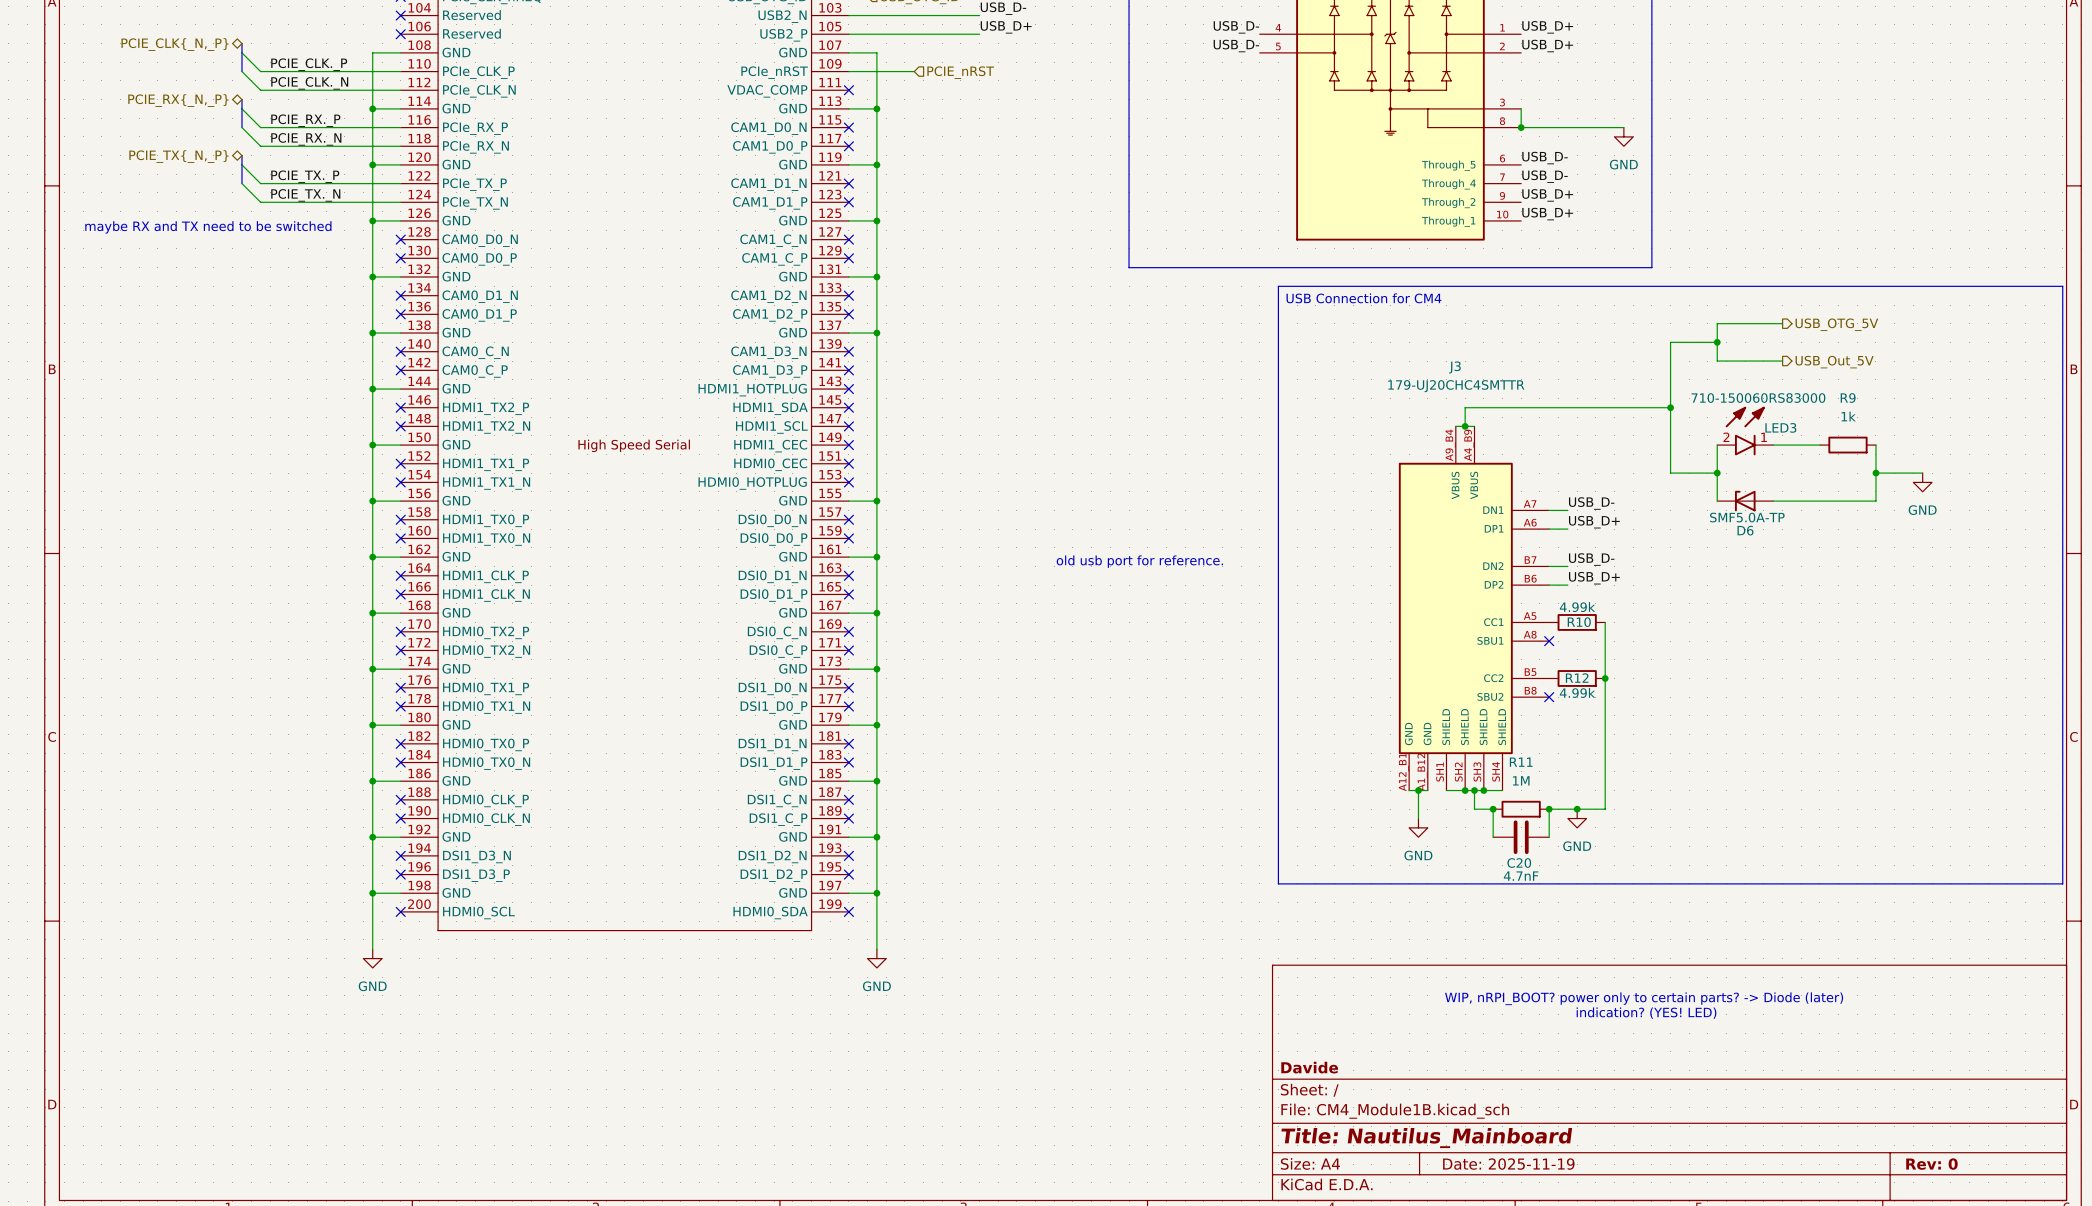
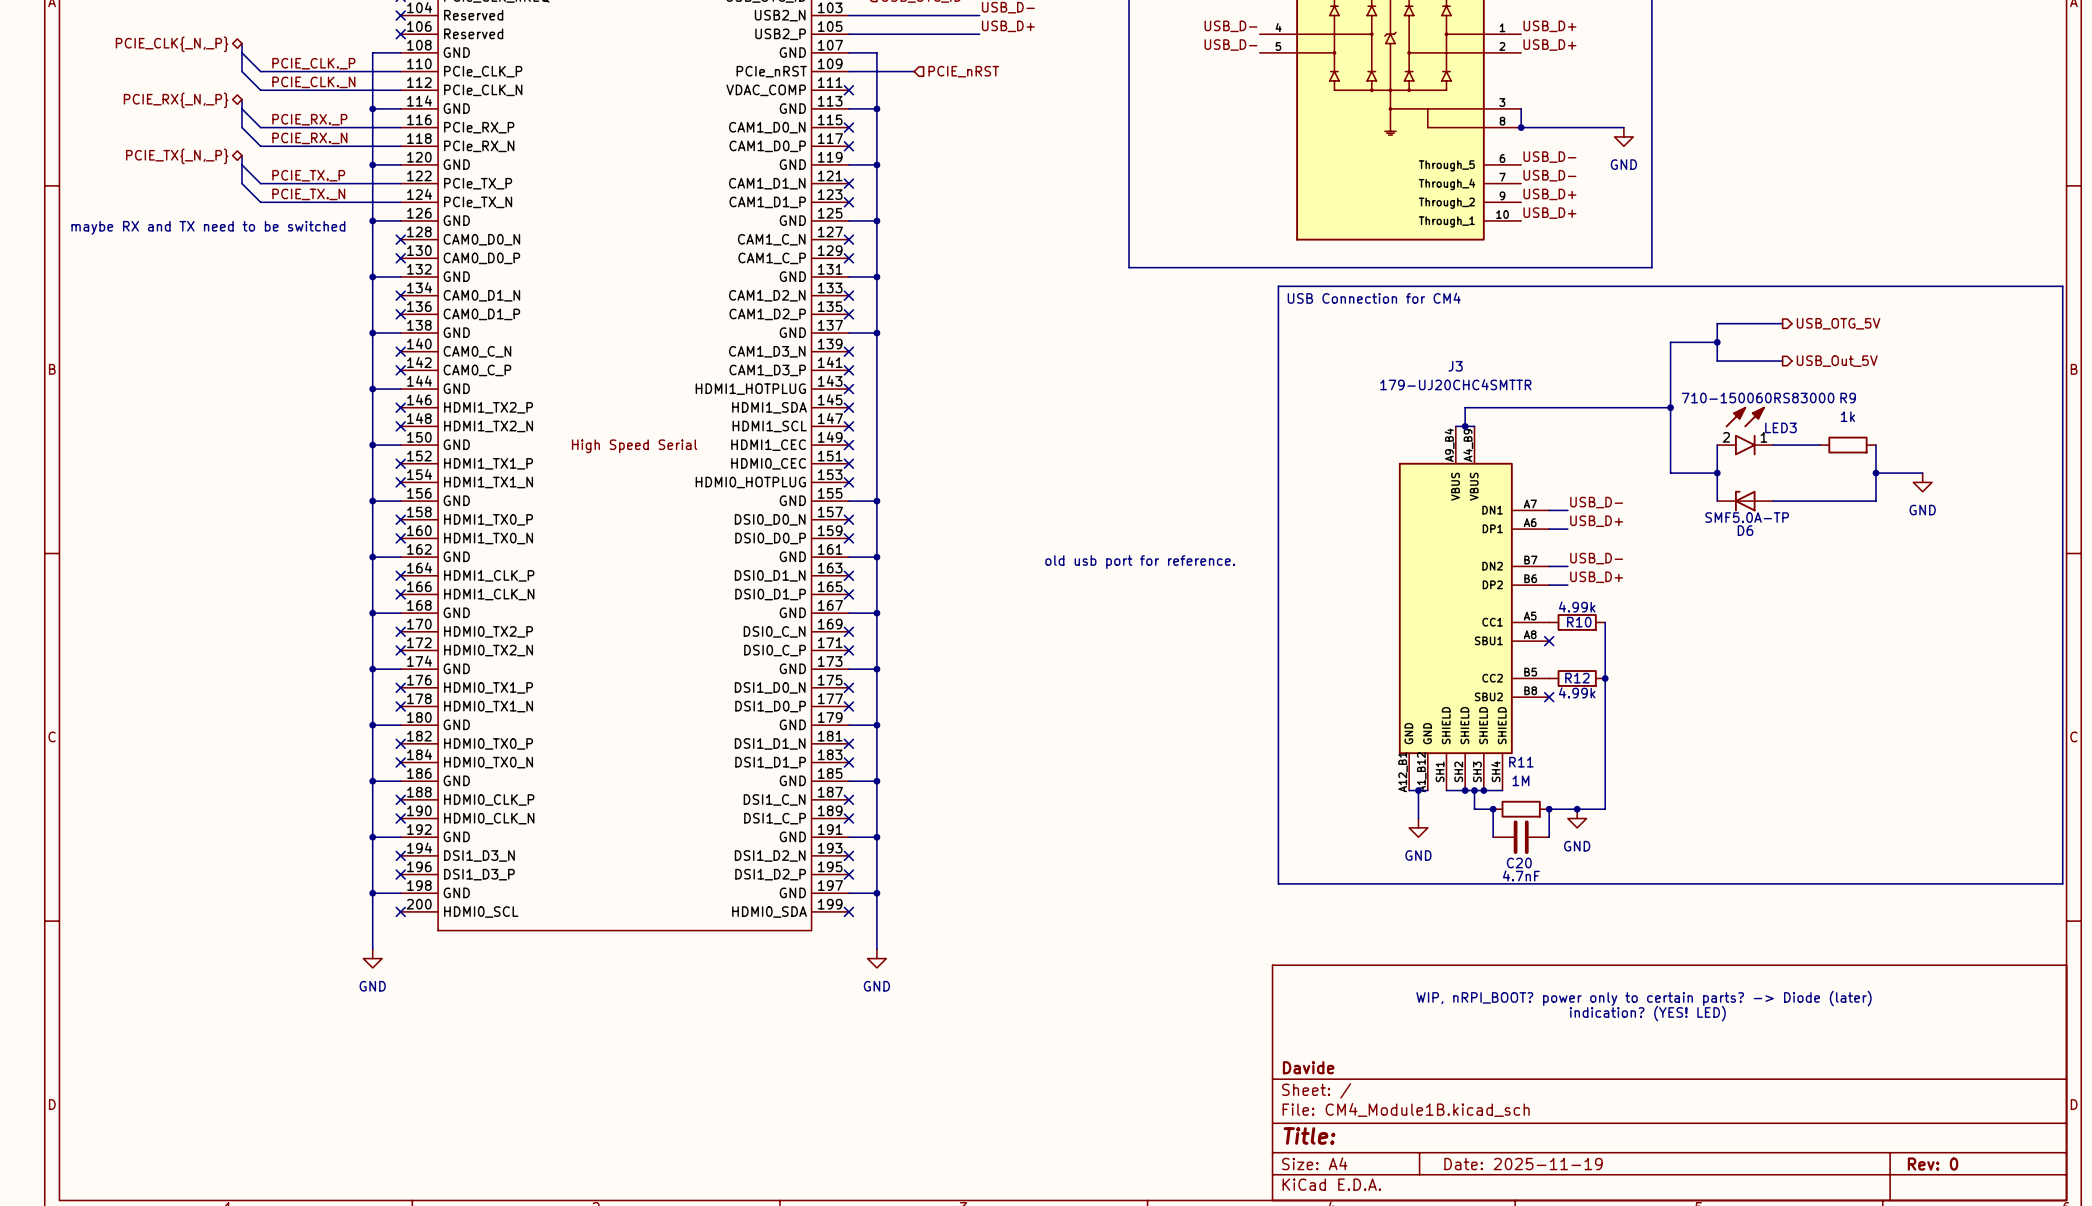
title block: Title: Nautilus_Mainboard (1426, 1138) -> Title: (1309, 1135)

